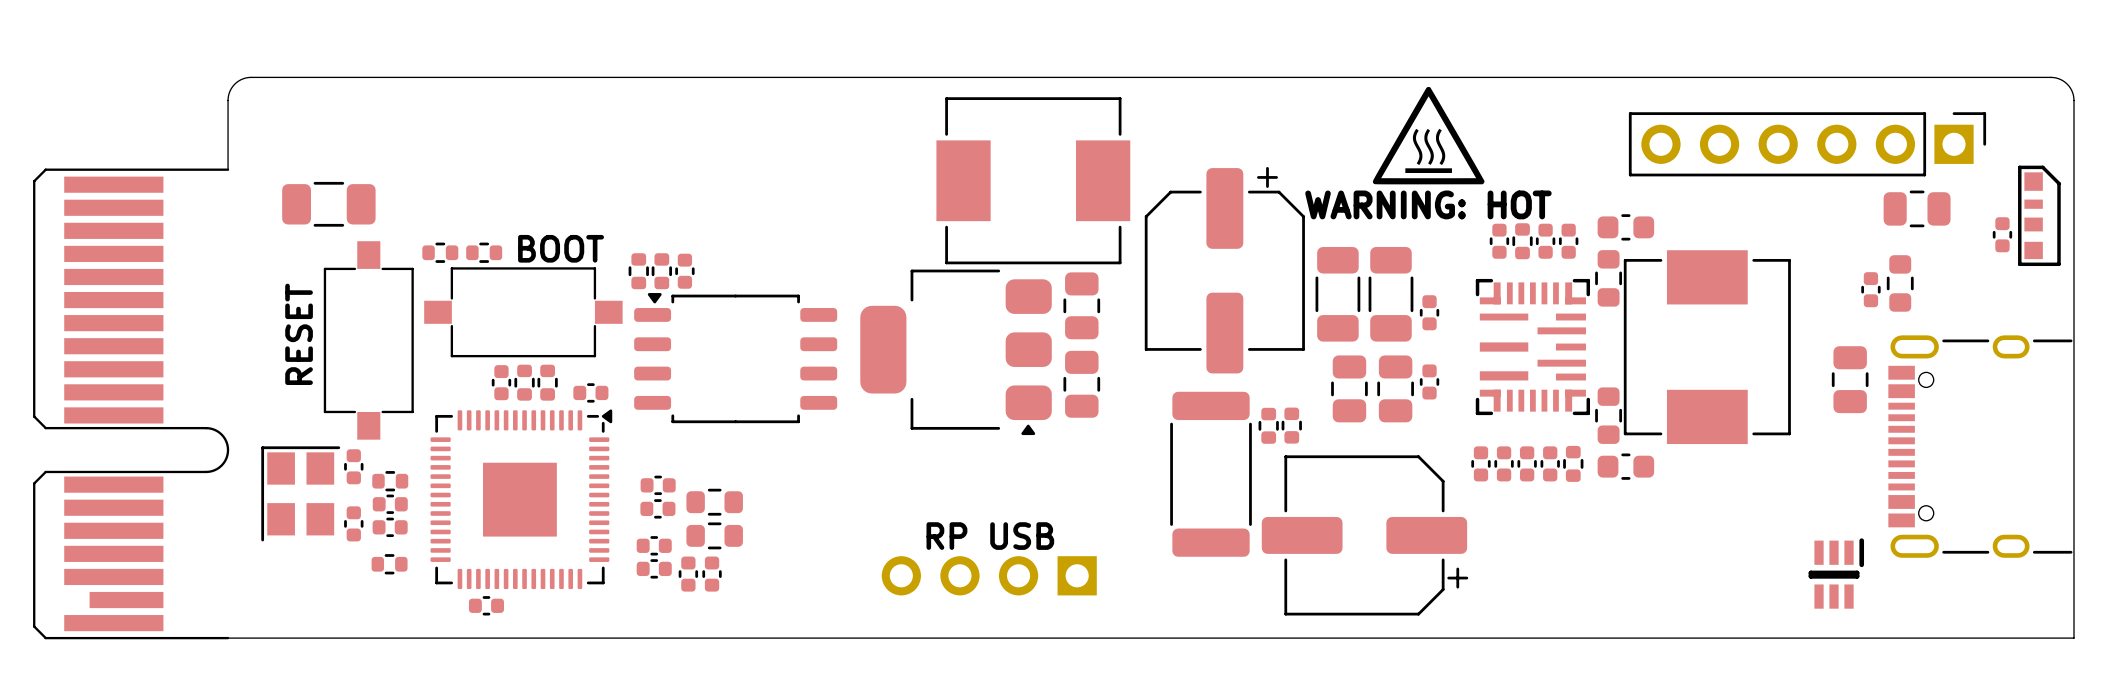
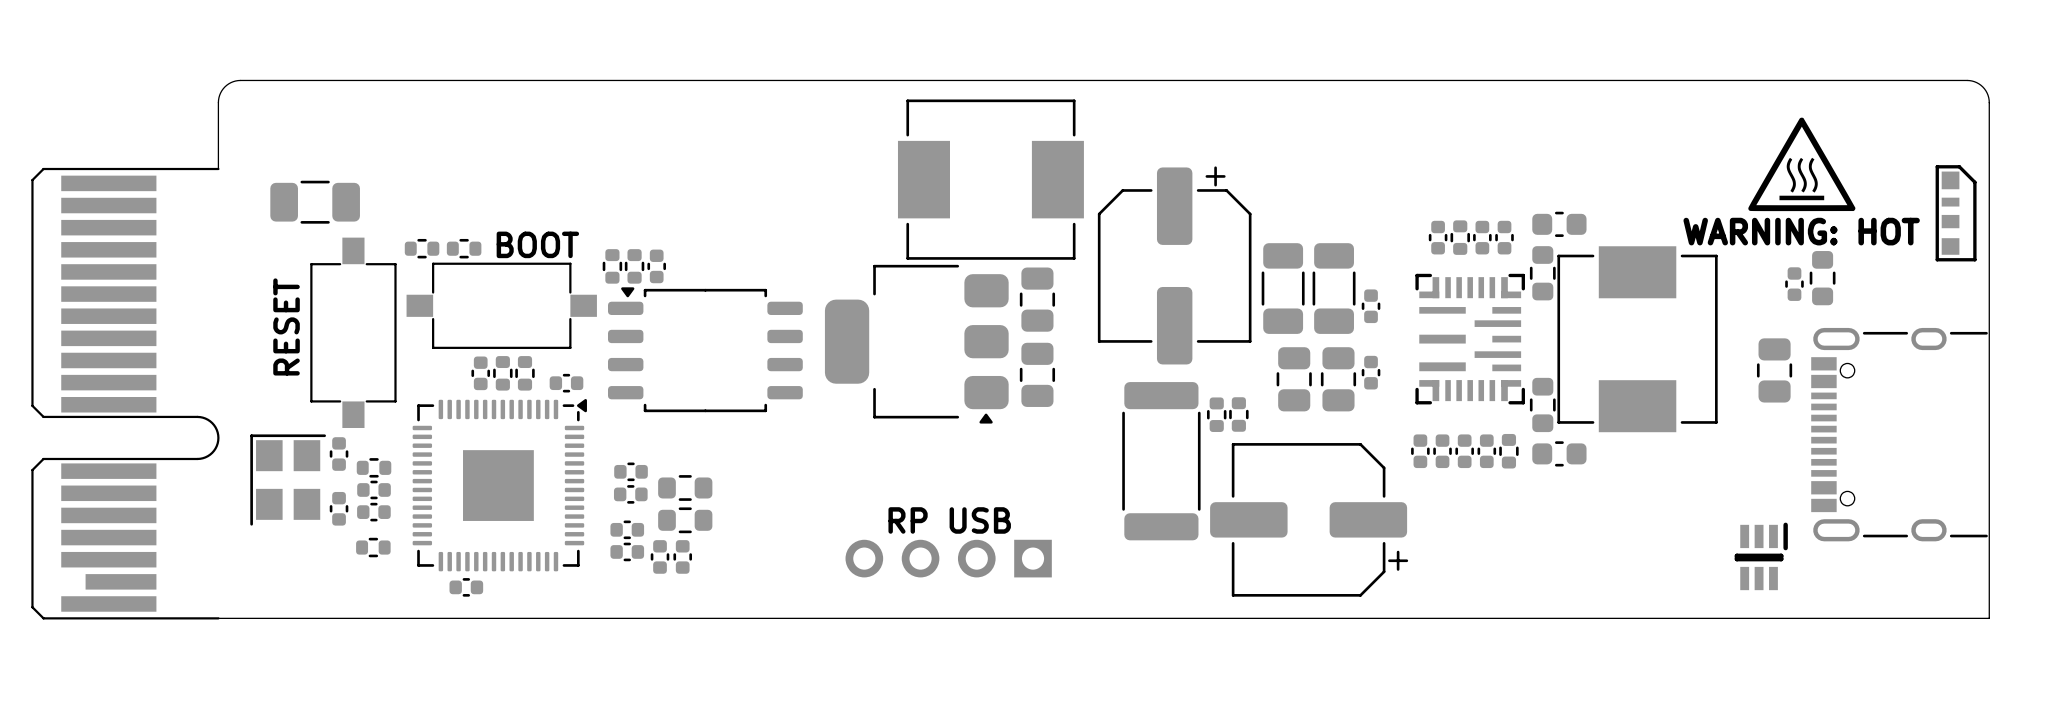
drawing position: (1428, 135) -> (1801, 164)
part: (1807, 144) -> none
text position: WARNING: HOT (1428, 204) -> WARNING: HOT (1801, 231)
part: (1917, 208) -> none
part: (2002, 234) -> none

